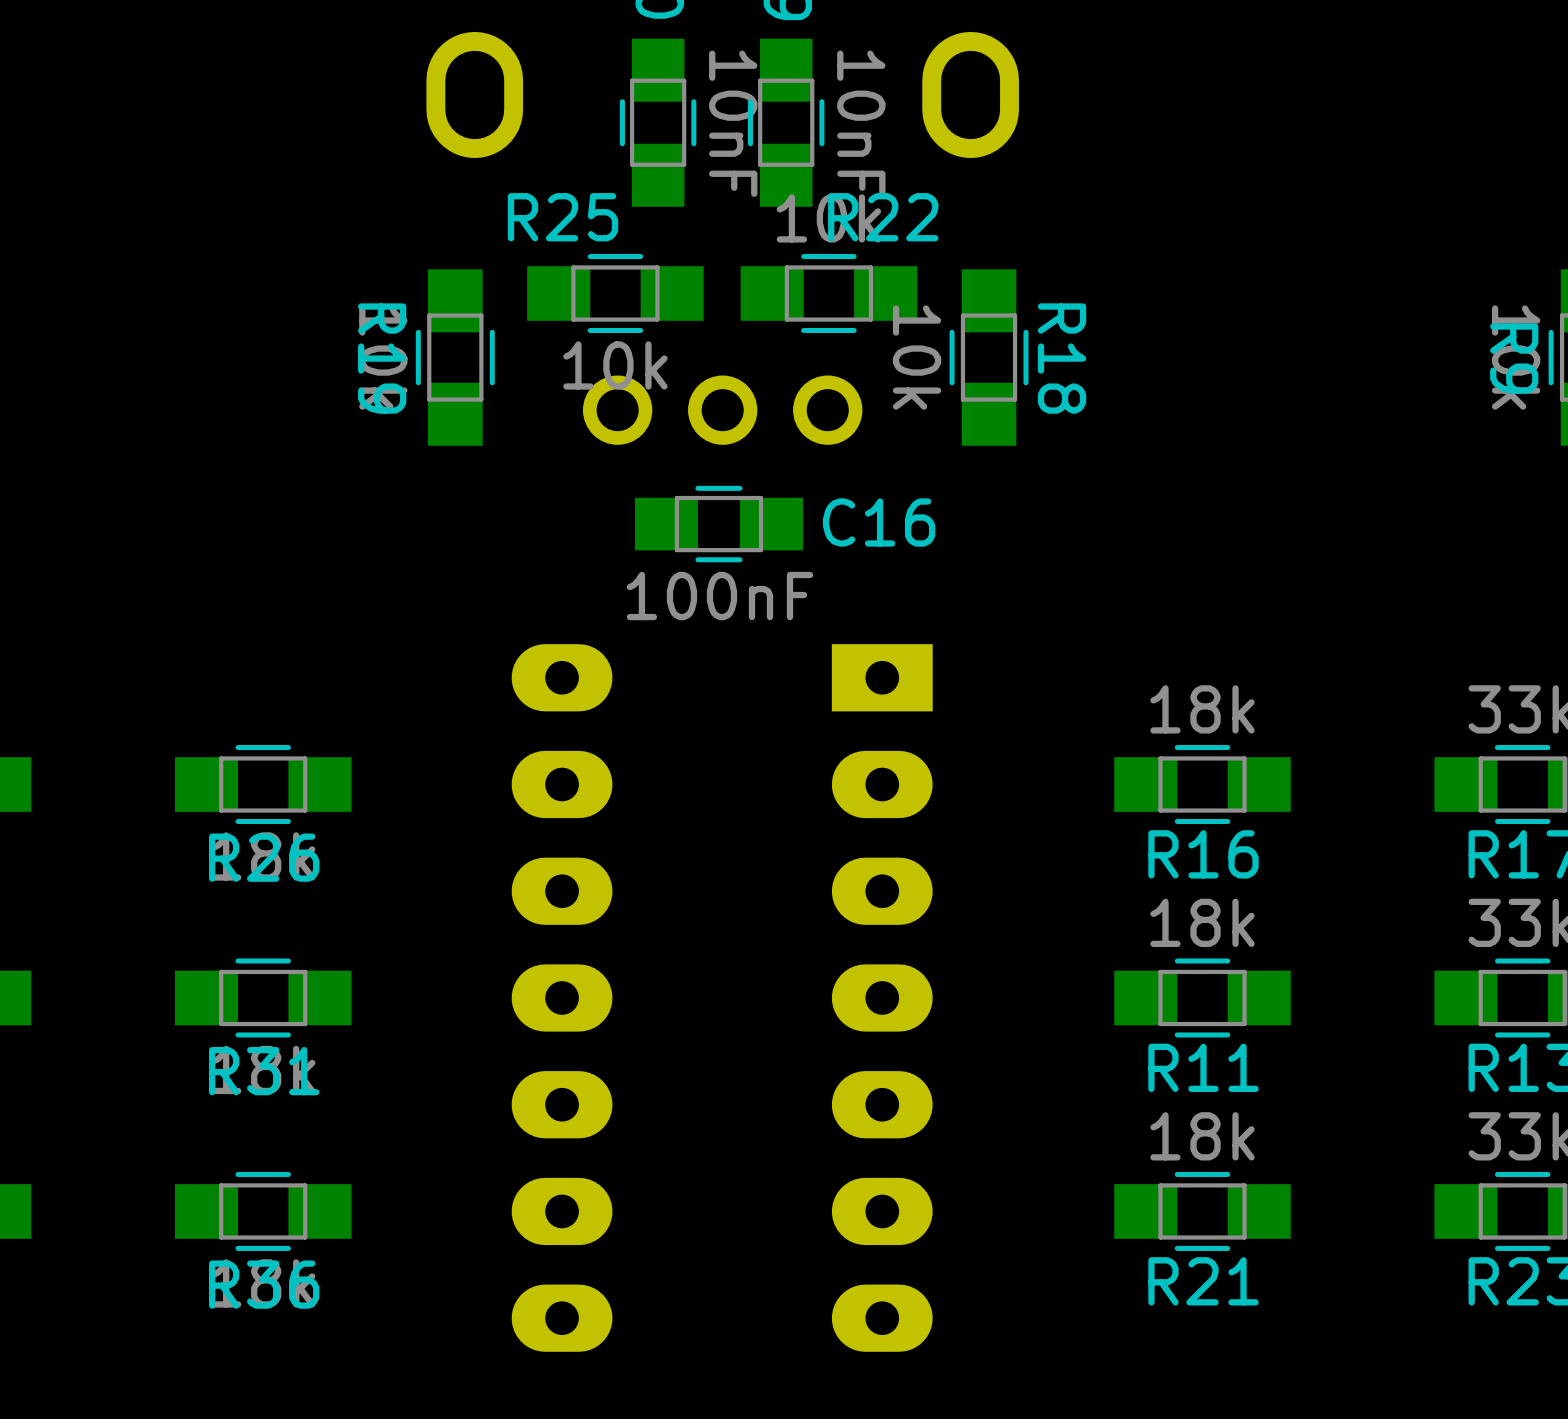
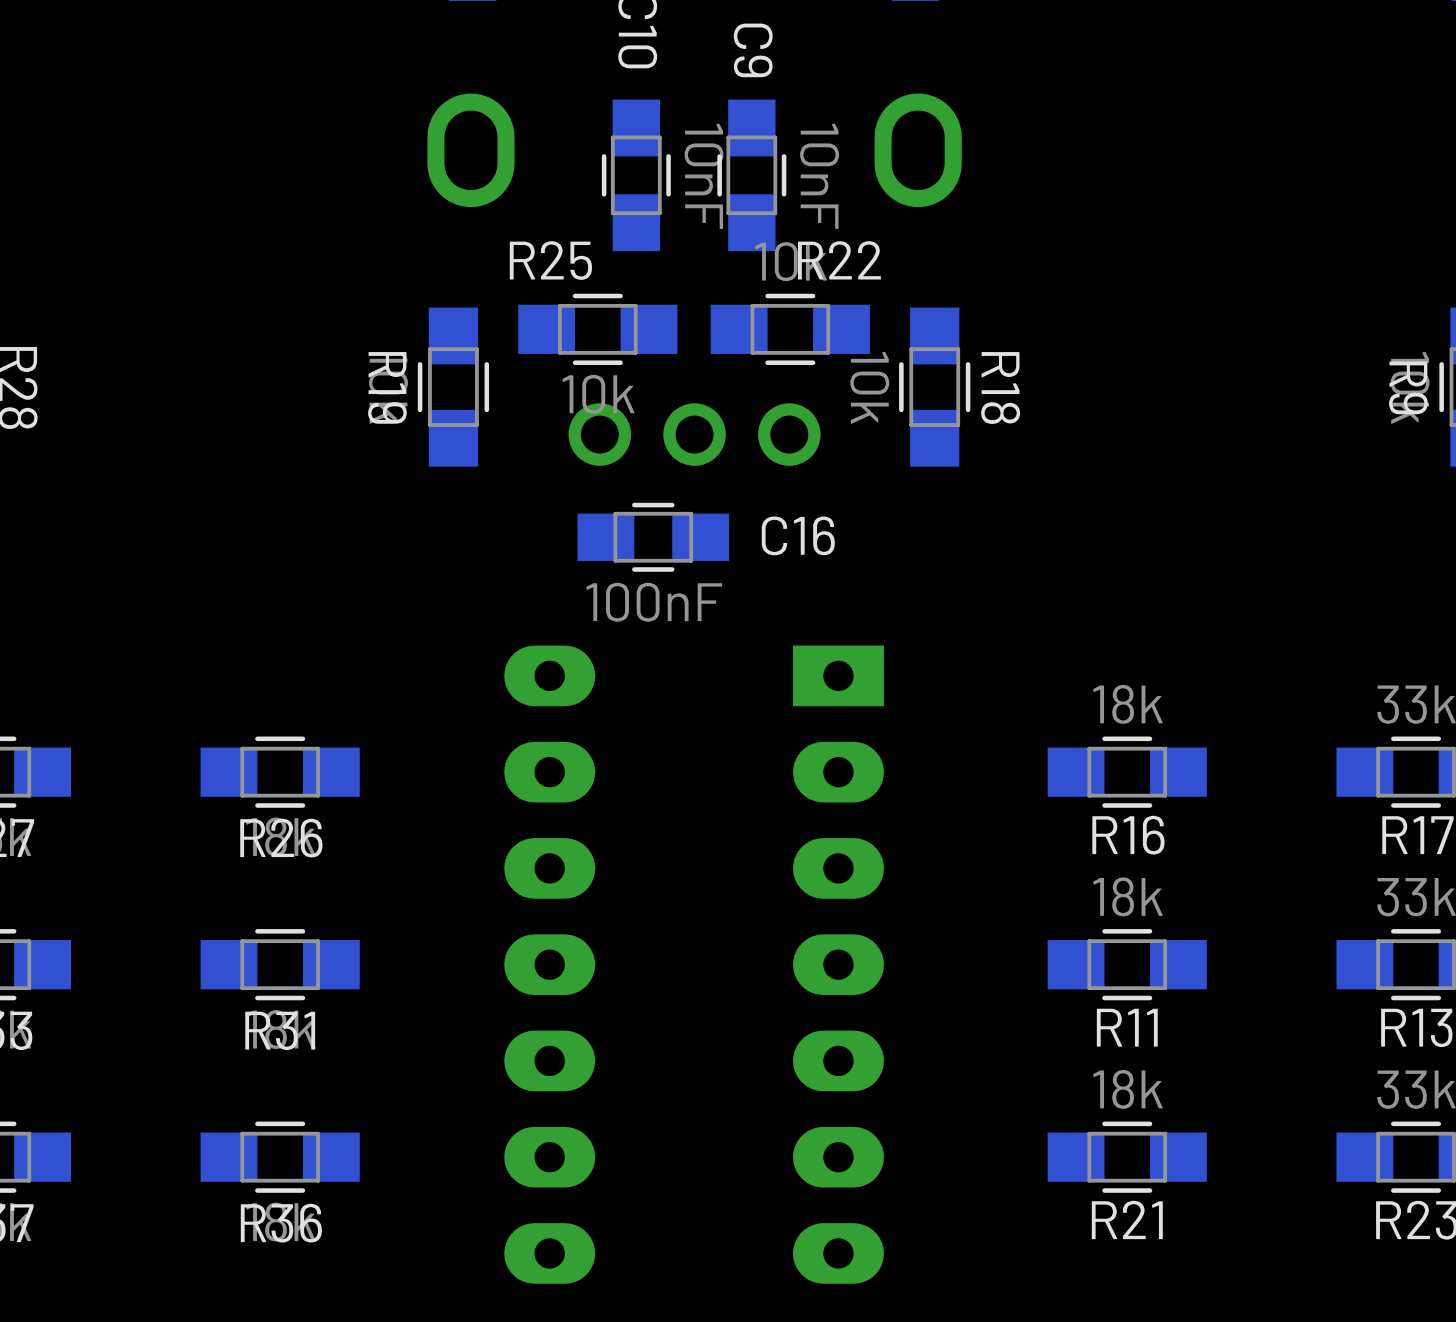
C16 position: (718, 524) -> (653, 537)

